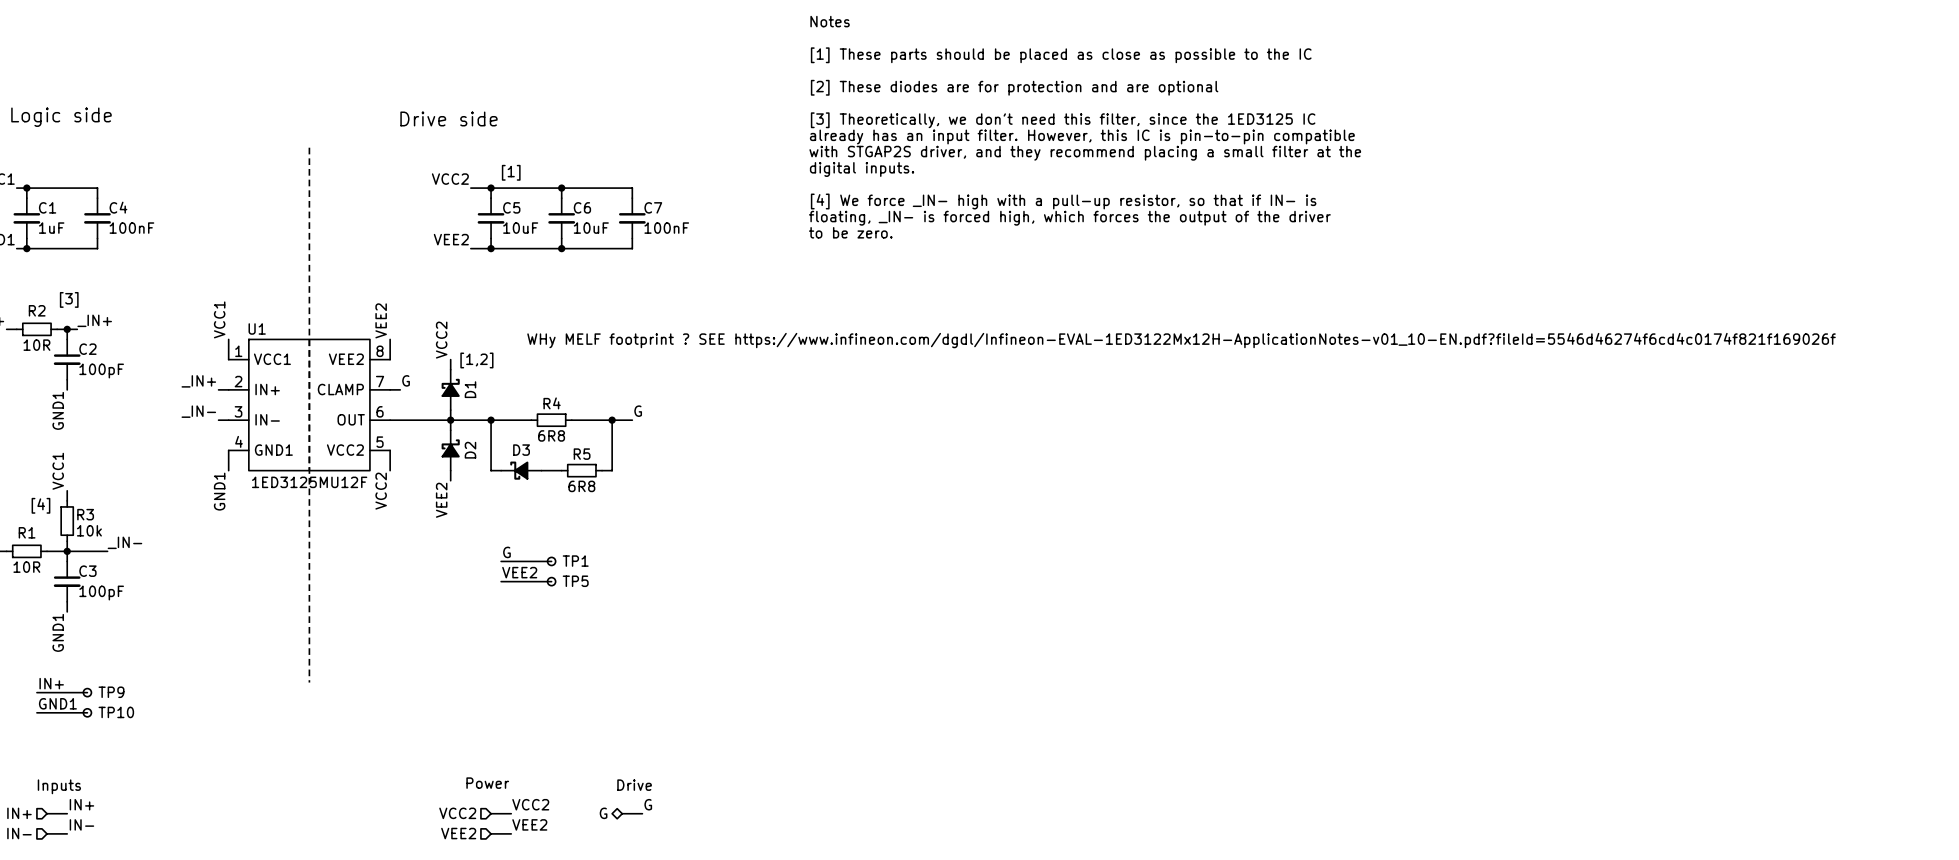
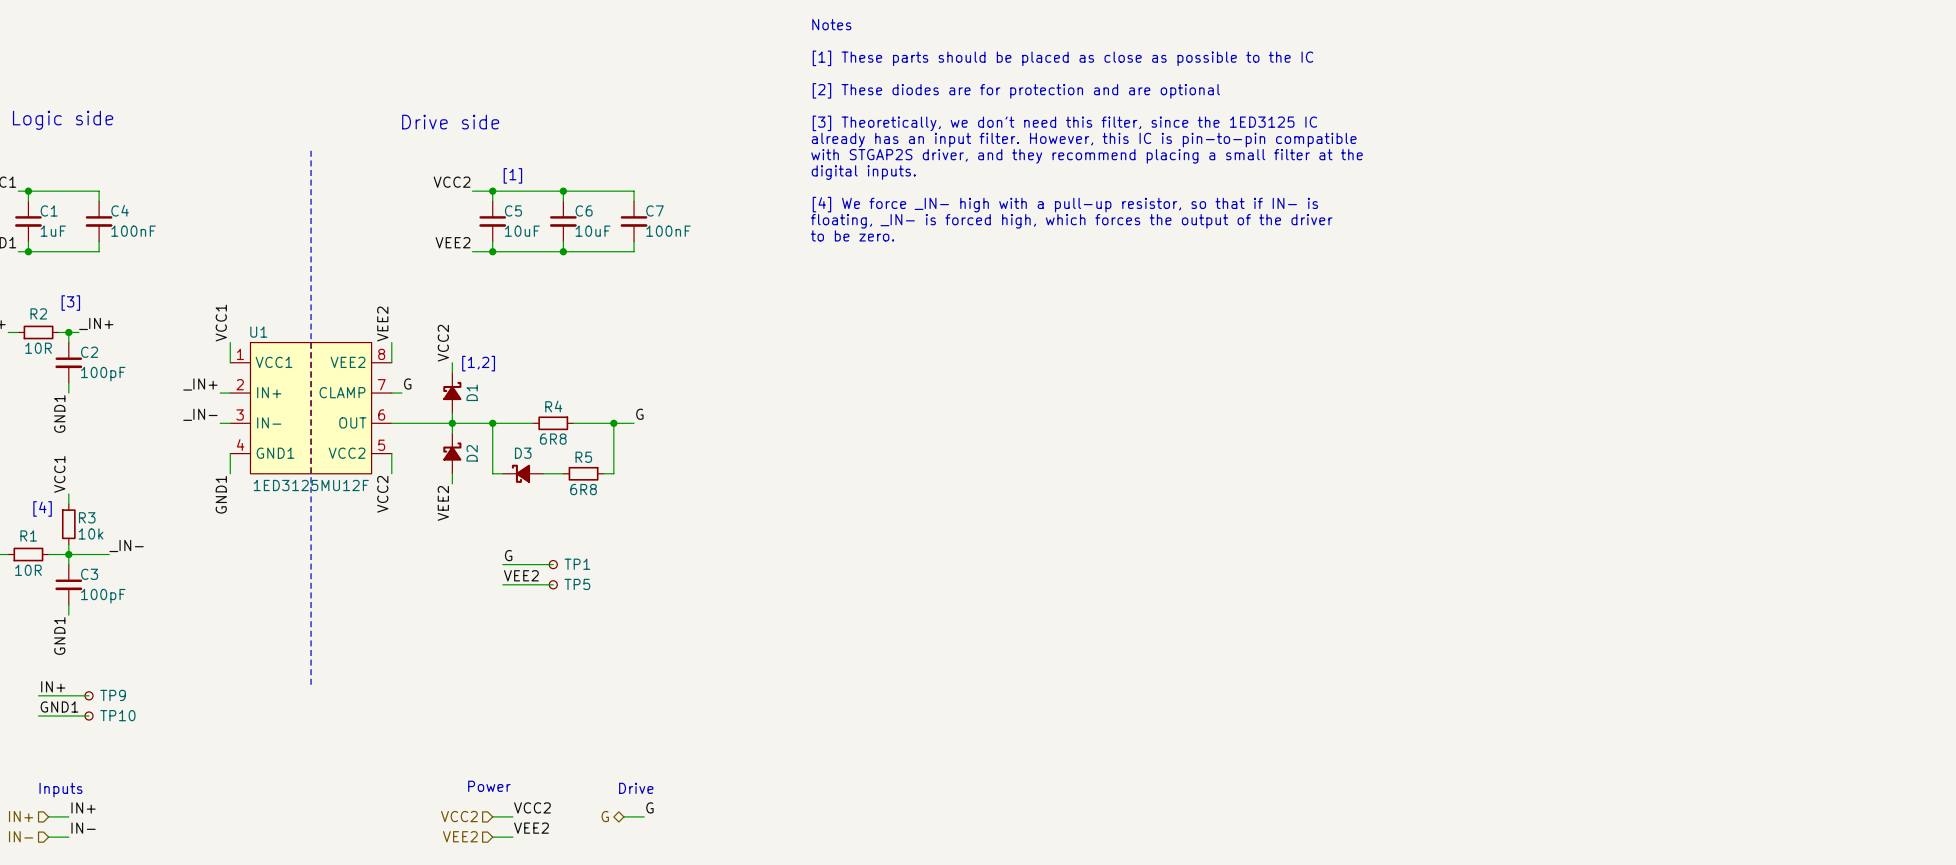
text: WHy MELF footprint ? SEE https://www.infineon.com/dgdl/Infineon-EVAL-1ED3122Mx12H-ApplicationNotes-v01_10-EN.pdf?fileId=5546d46274f6cd4c0174f821f169026f (1181, 340) -> none

